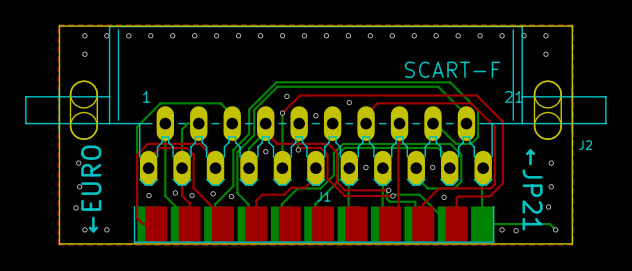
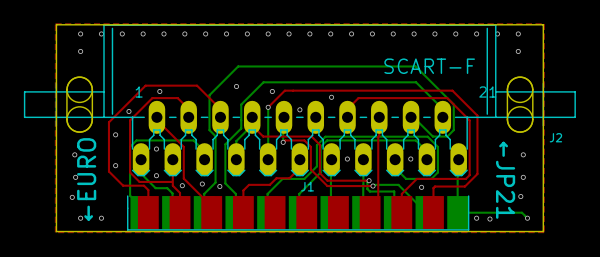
bottom track: (450, 82) (276, 82) (249, 109) (249, 134) (233, 149) (233, 186) (227, 192) -> (427, 78) (415, 66) (238, 66) (209, 95) (209, 130) (215, 136) (215, 182)
via: none -> (236, 86)
via: none -> (159, 91)
via: none -> (128, 111)
bottom track: (165, 123) (165, 196) (181, 212) -> (141, 159) (141, 173) (155, 188) (167, 188) (172, 193) (172, 201)
bottom track: (198, 123) (187, 123) (182, 129) (182, 168) -> none
bottom track: (232, 123) (232, 114) (220, 103) (160, 103) (137, 126) (137, 154) -> (204, 159) (204, 151) (193, 140) (136, 140) (130, 146)
top track: none -> (220, 117) (220, 109) (197, 85) (145, 85) (108, 122) (108, 171) (123, 185) (143, 185) (148, 190) (148, 212)
via: none -> (115, 134)
top track: (186, 147) (160, 147) (148, 159) (148, 168) -> (177, 140) (156, 120) (156, 117)
via: (265, 151) -> none
top track: (137, 154) (147, 143) (199, 143) (215, 159) (215, 168) -> (130, 146) (130, 120) (152, 98) (177, 98) (188, 109) (188, 117)
via: none -> (156, 149)
via: none -> (115, 165)
top track: (137, 181) (137, 218) (143, 224) (156, 224) -> (130, 172) (139, 181) (171, 181)
via: none -> (156, 175)
via: (175, 192) -> none
via: (149, 195) -> none

